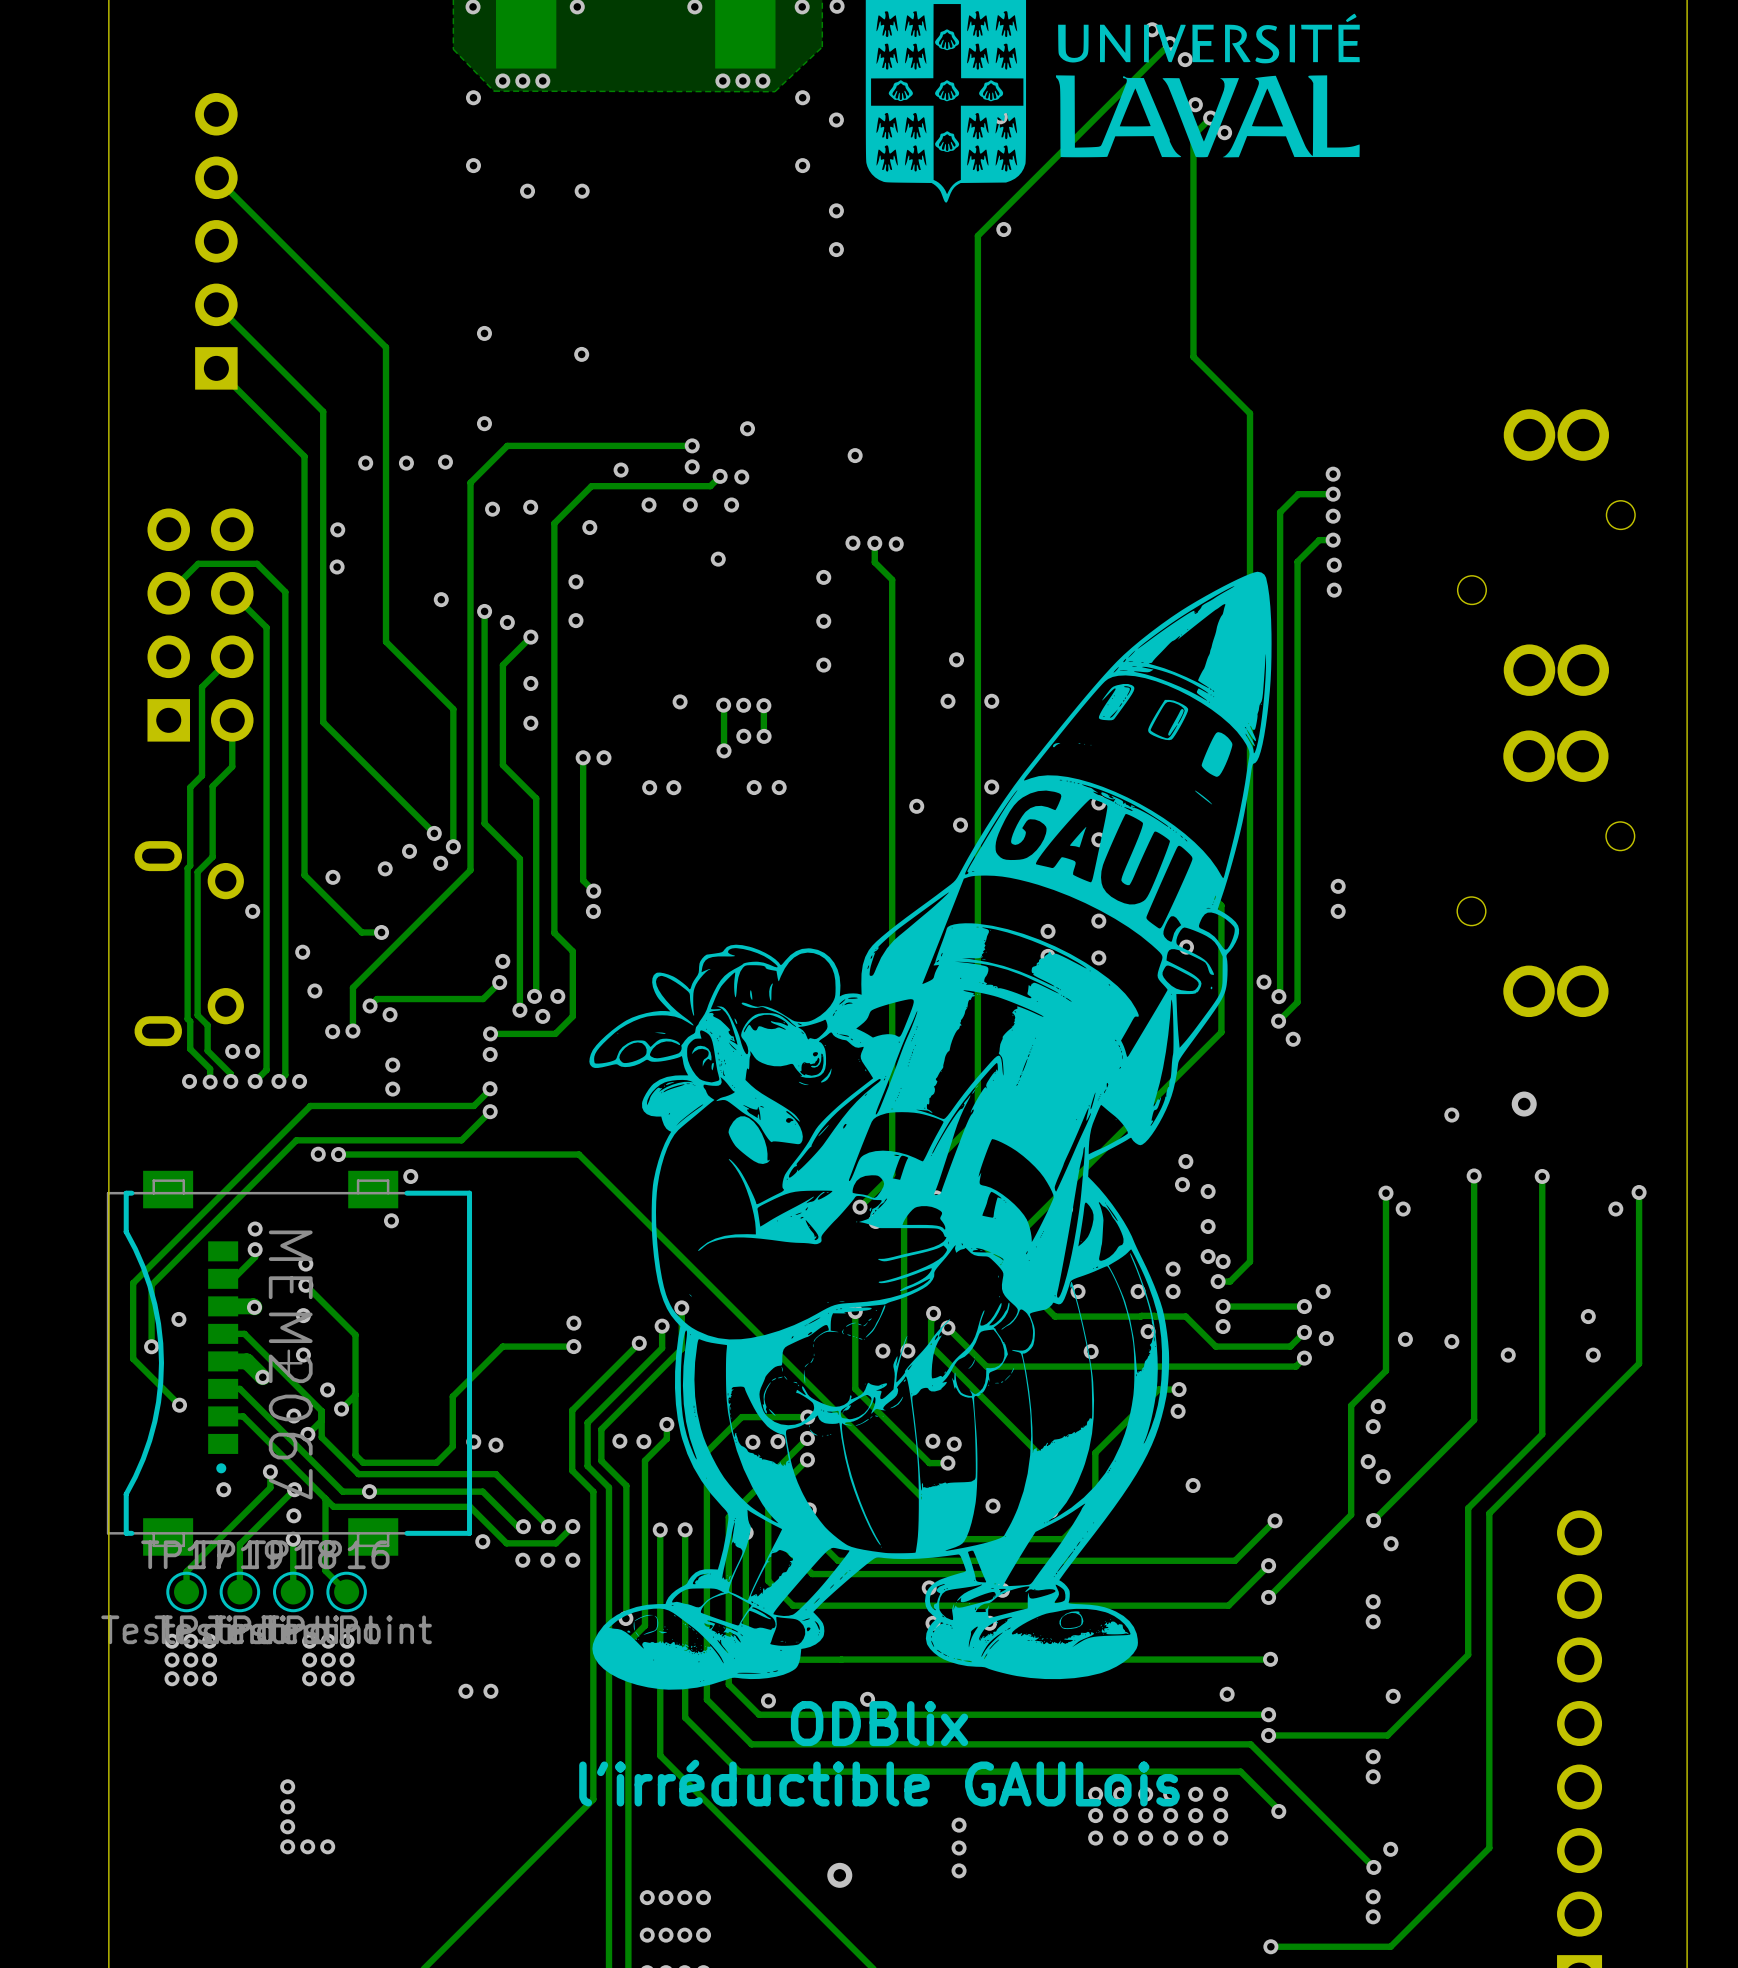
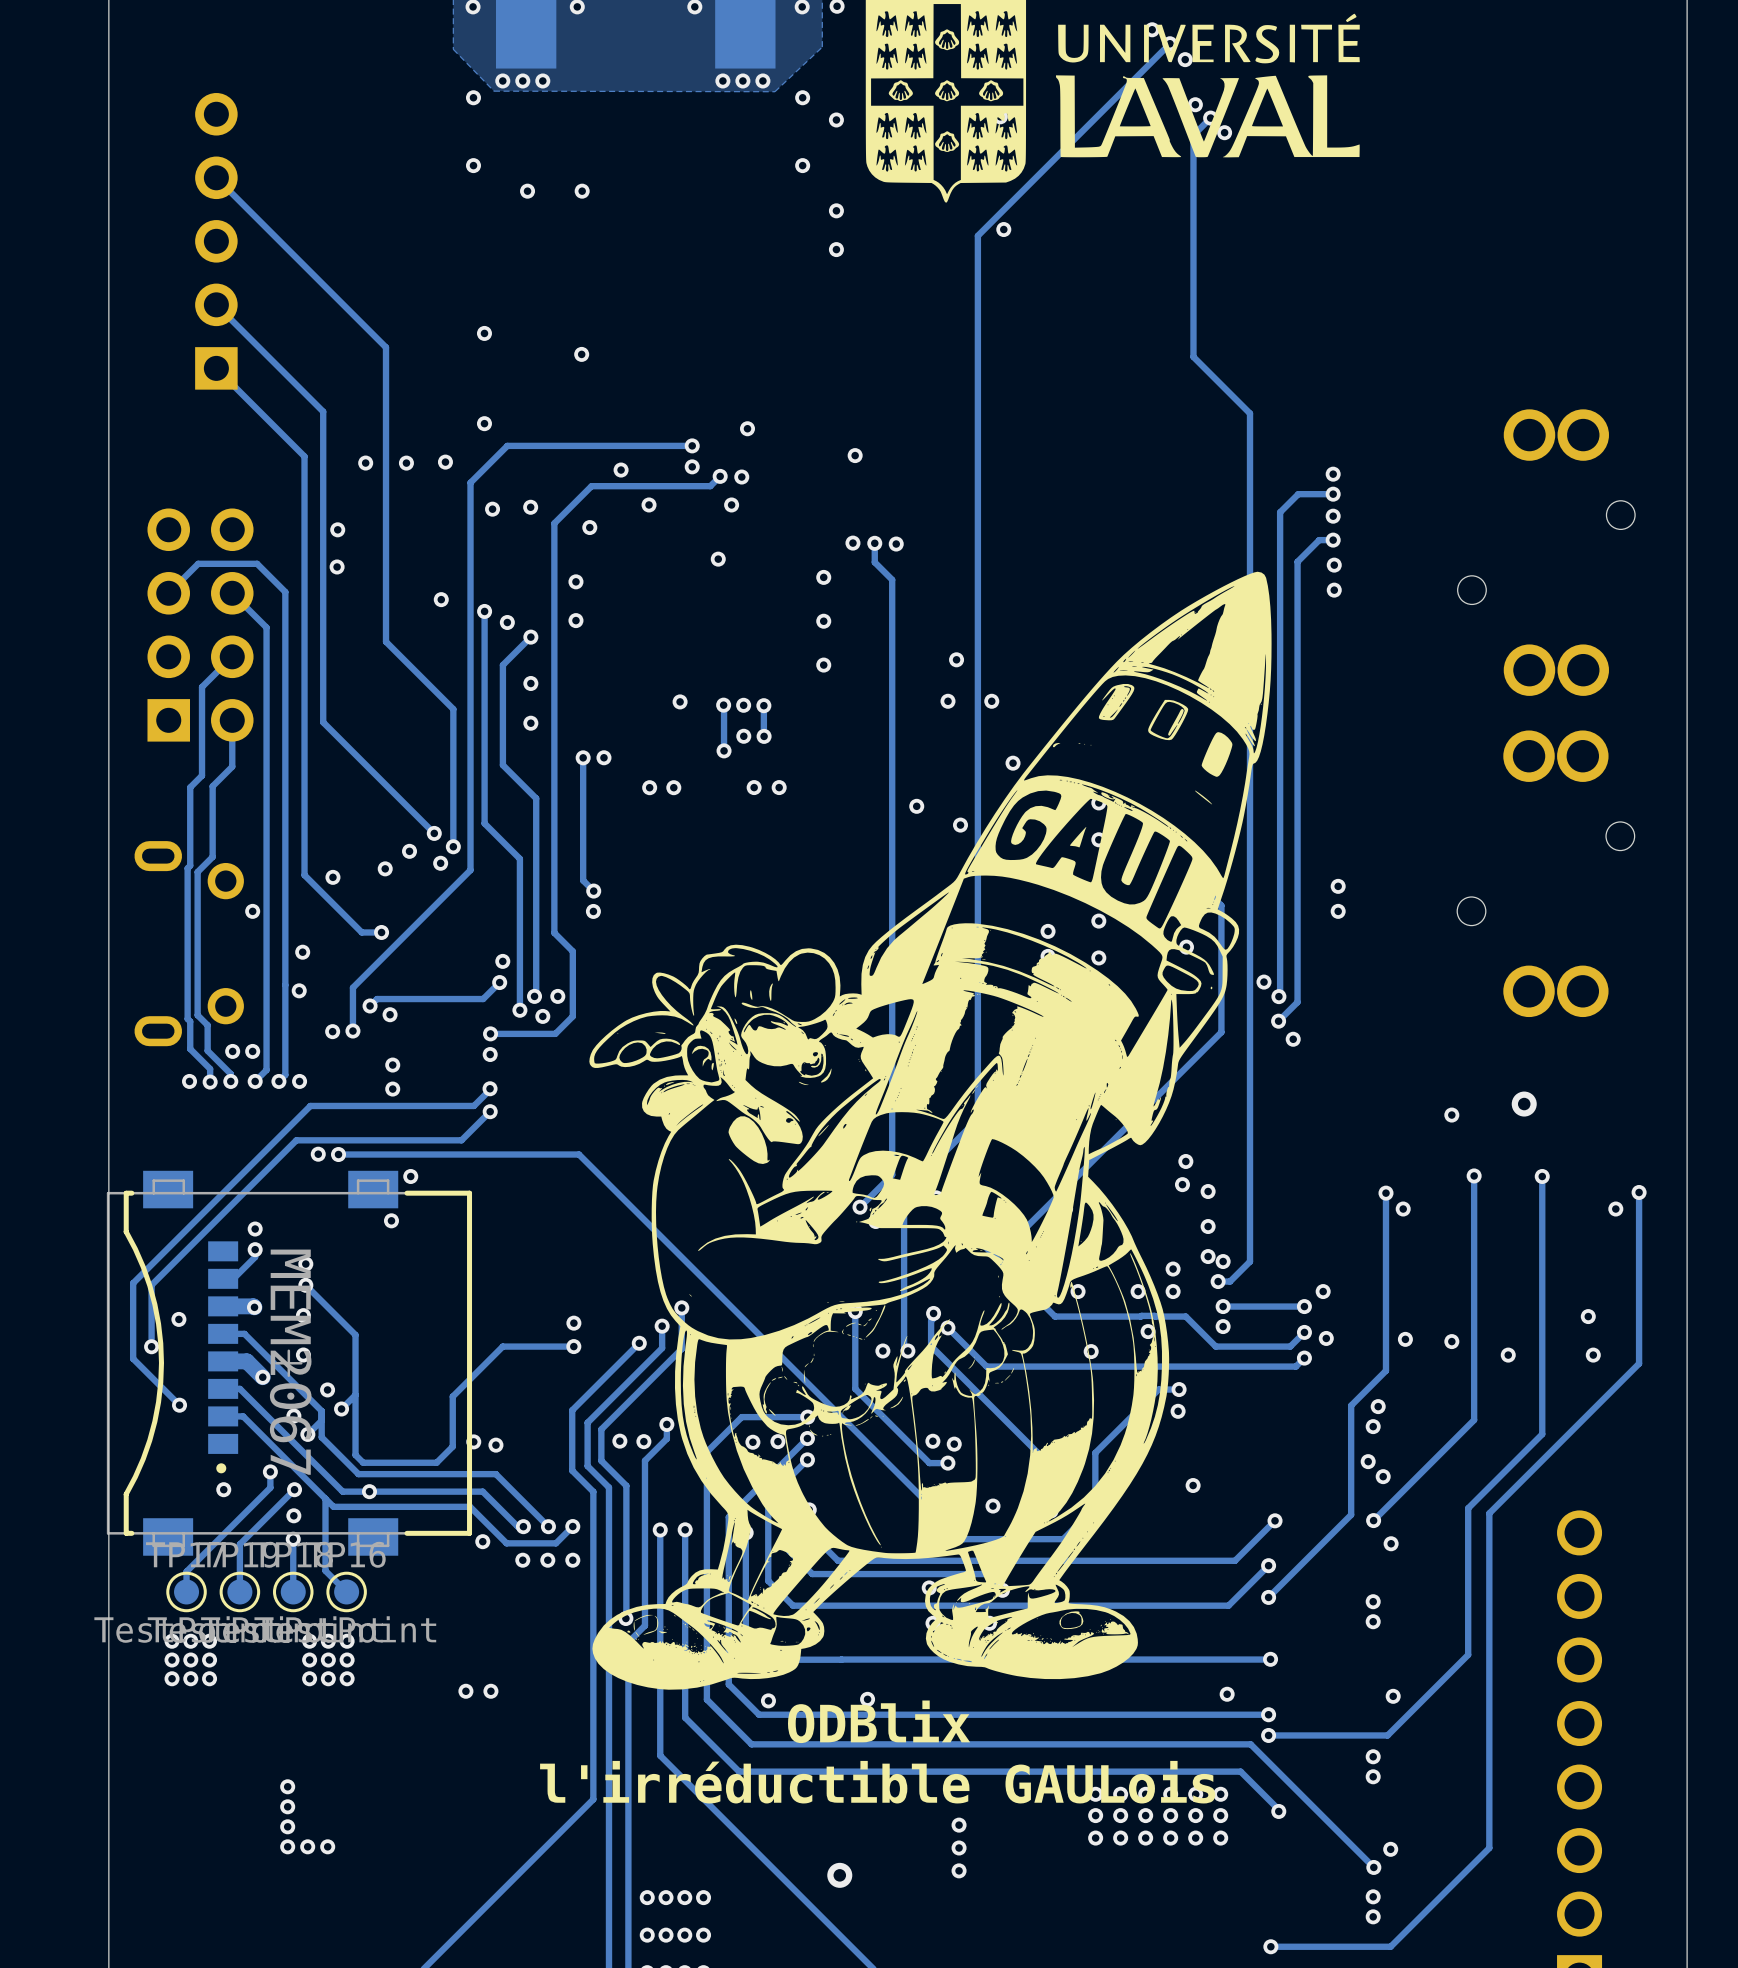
via: (690, 504) -> none
via position: (991, 787) -> (1013, 763)
via position: (314, 990) -> (299, 990)

